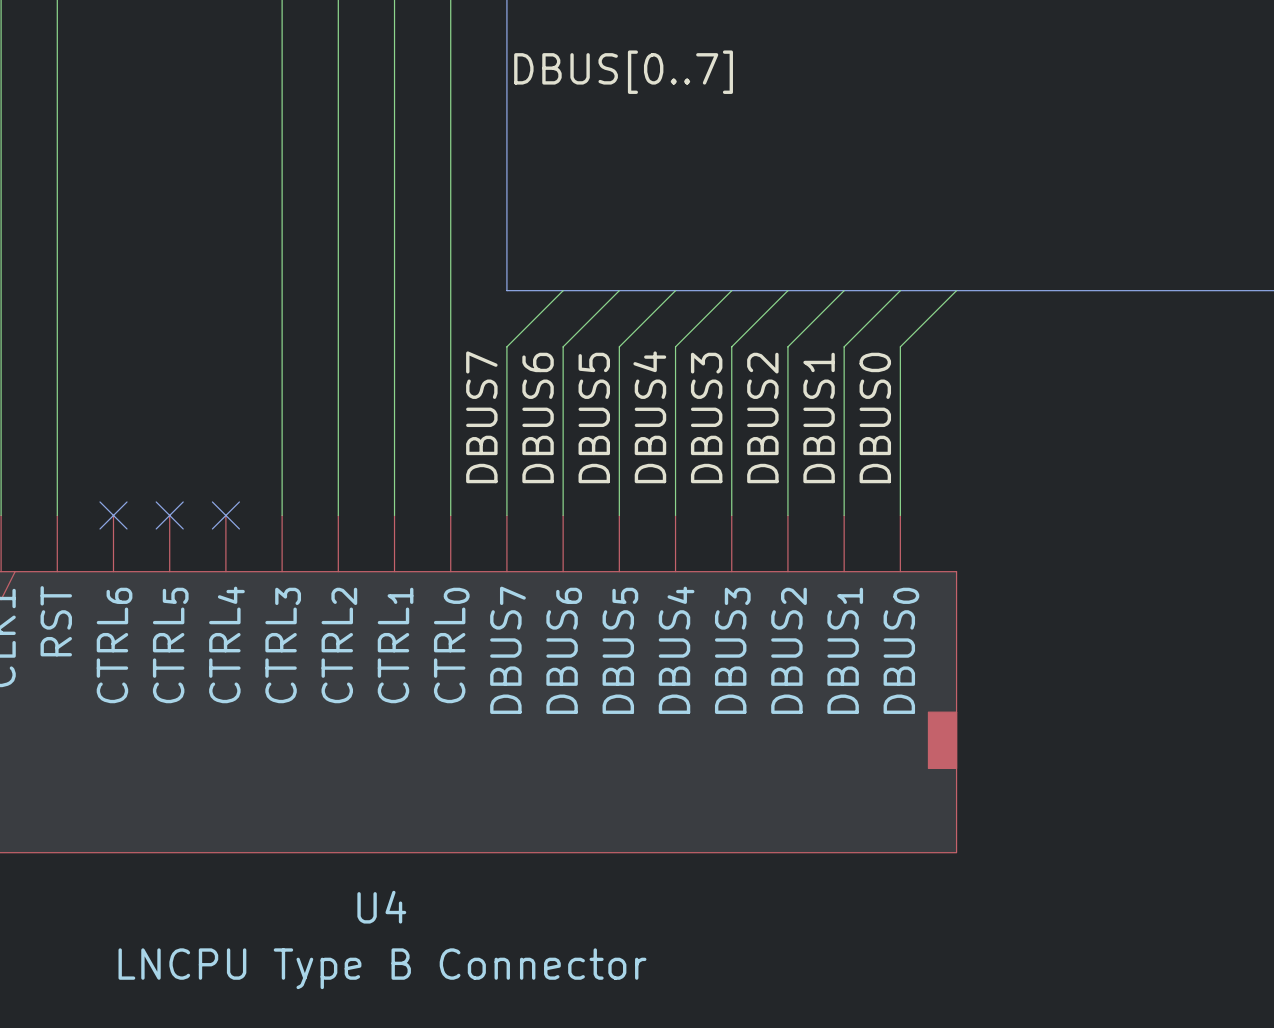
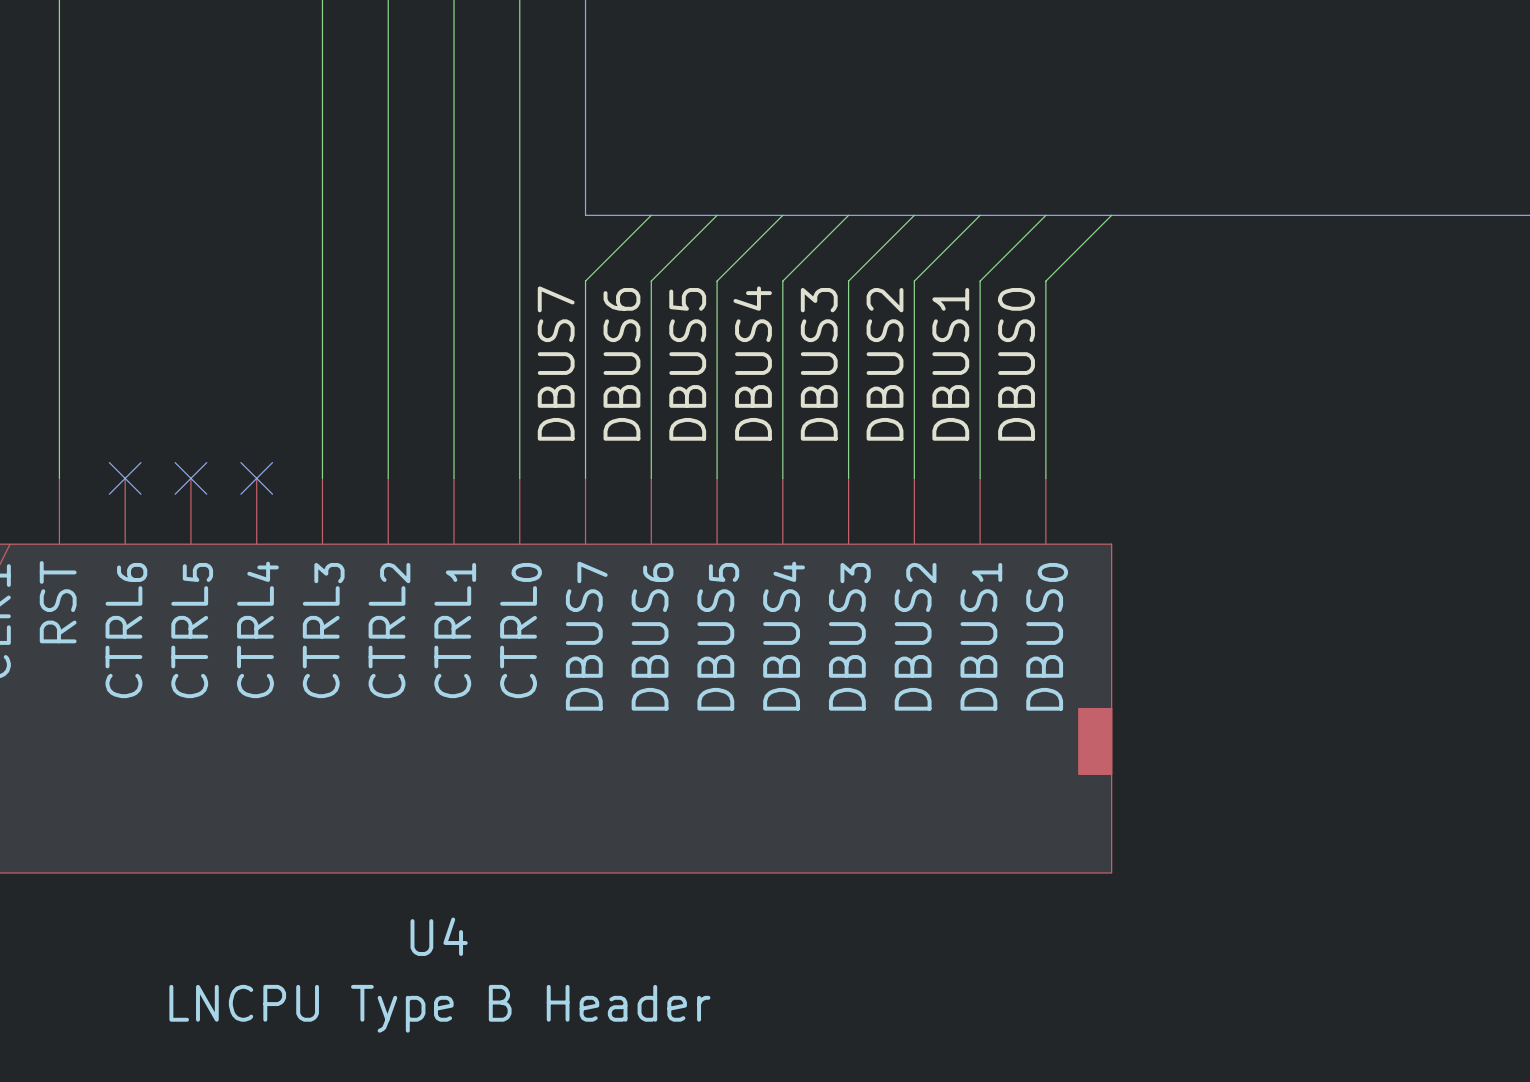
U4 value: LNCPU Type B Connector (382, 968) -> LNCPU Type B Header (439, 1008)

